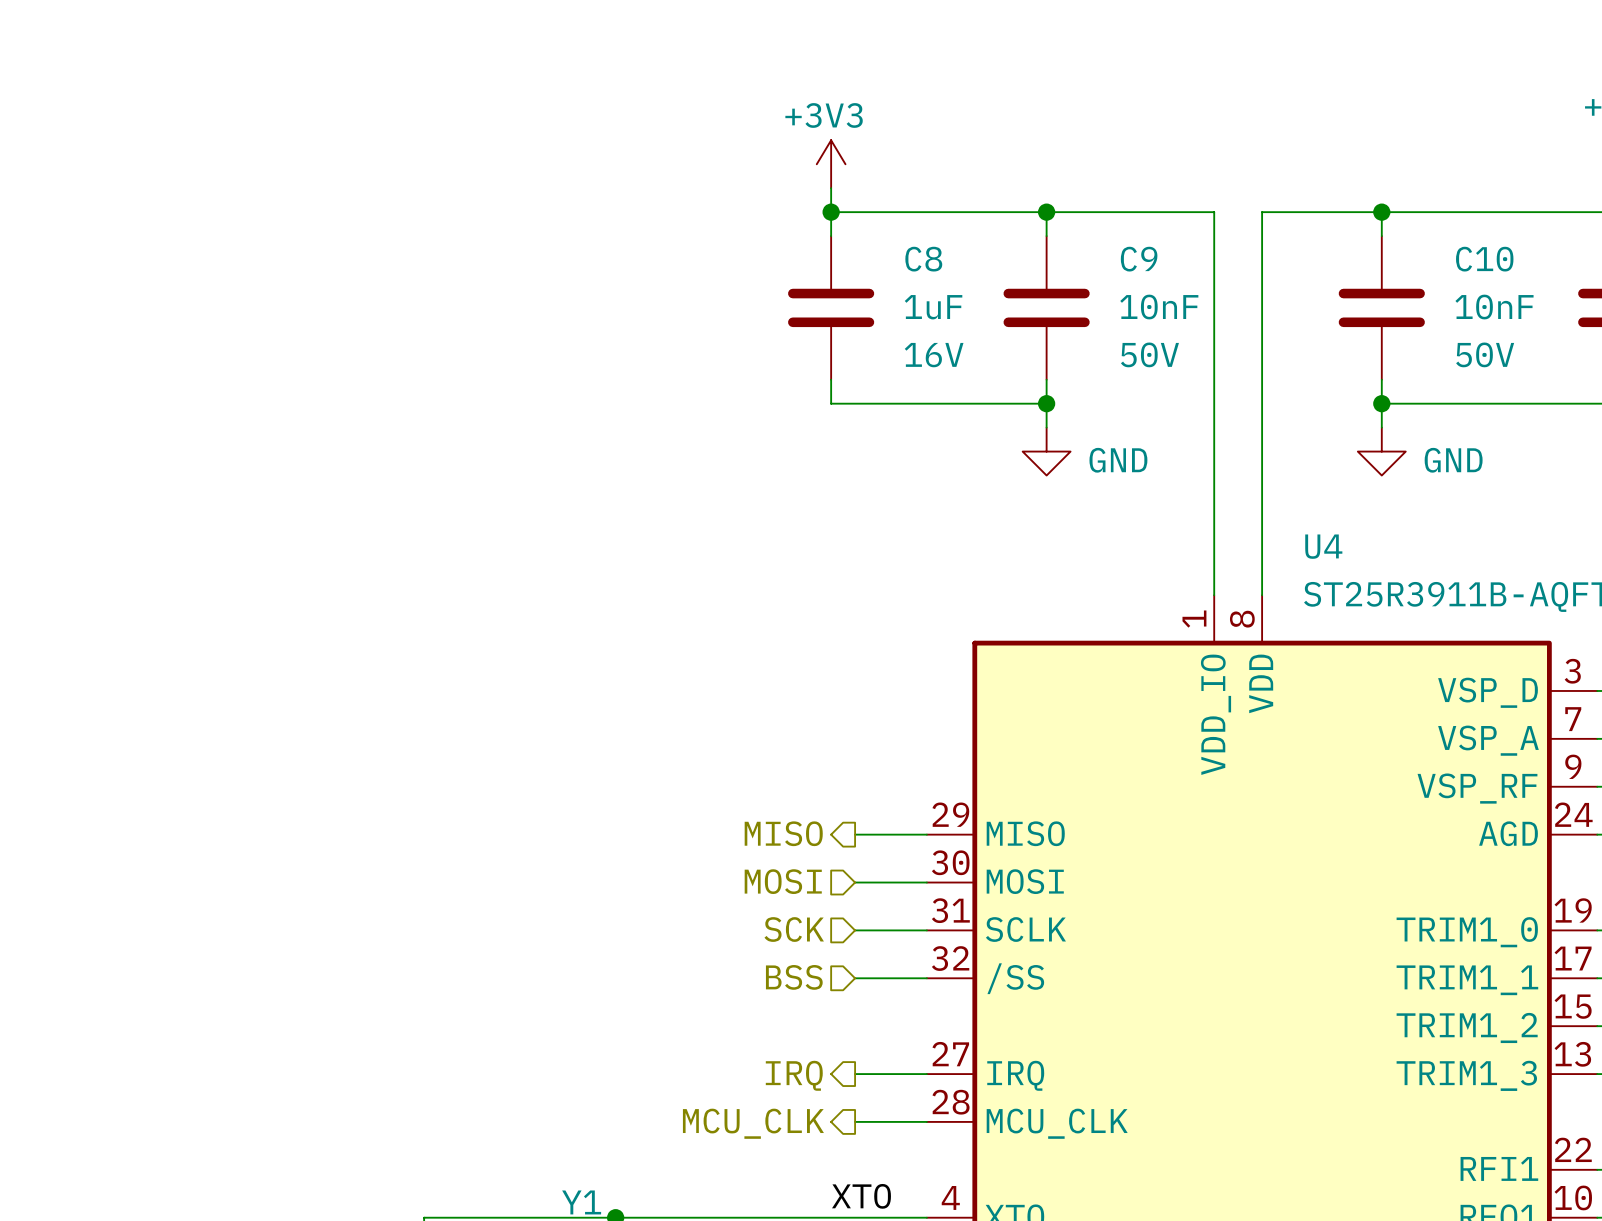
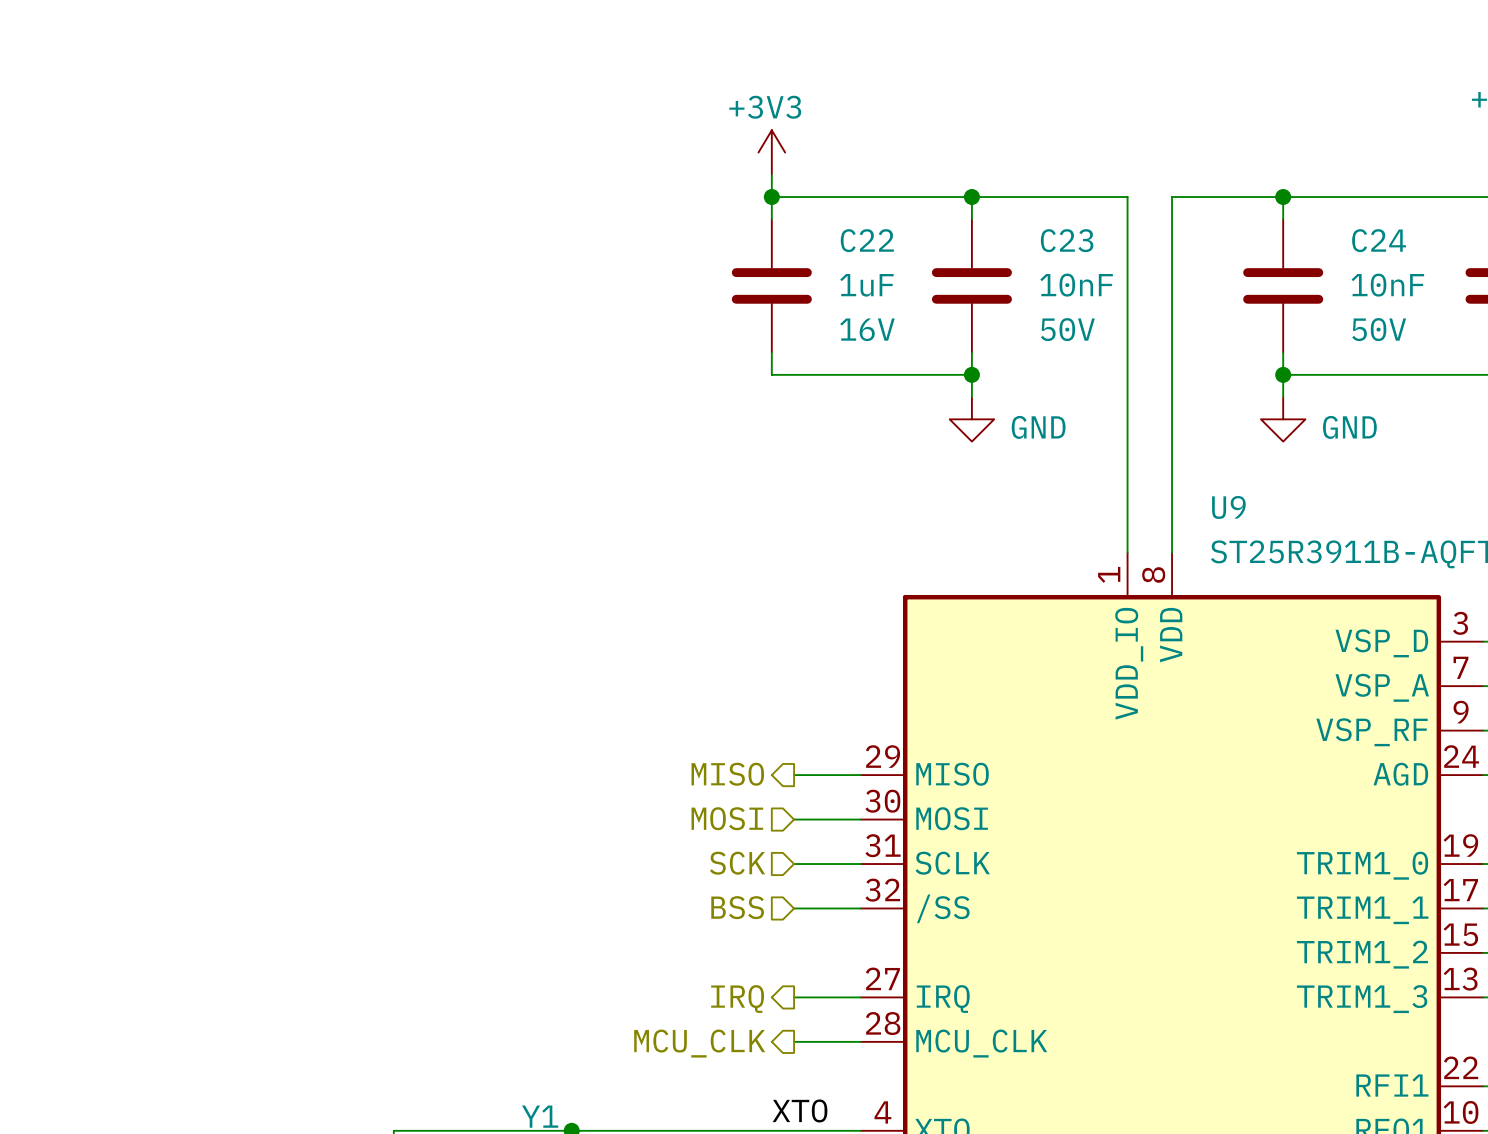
C8 name: C8 (923, 259) -> C22 (867, 240)
C9 name: C9 (1139, 259) -> C23 (1067, 240)
C10 name: C10 (1484, 259) -> C24 (1379, 240)
U4 name: U4 (1323, 546) -> U9 (1228, 507)

